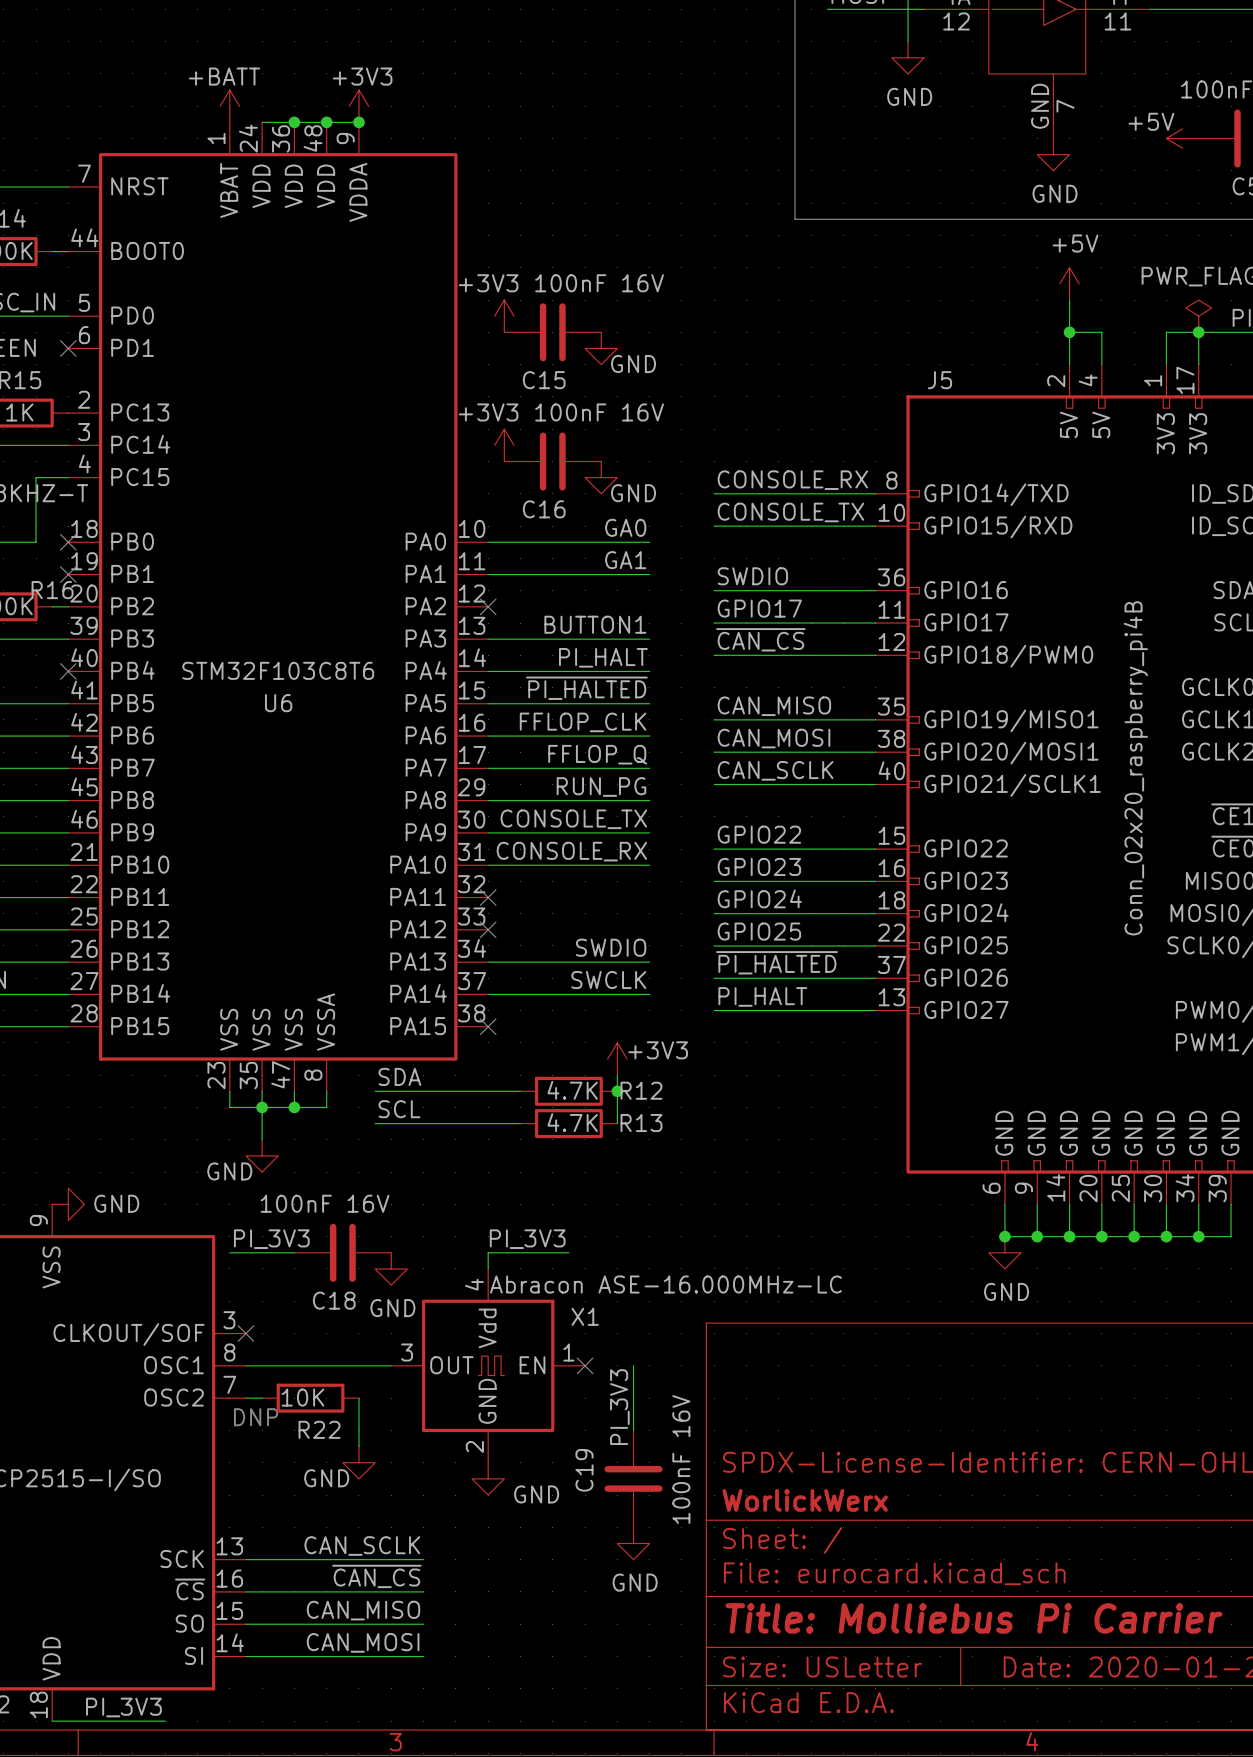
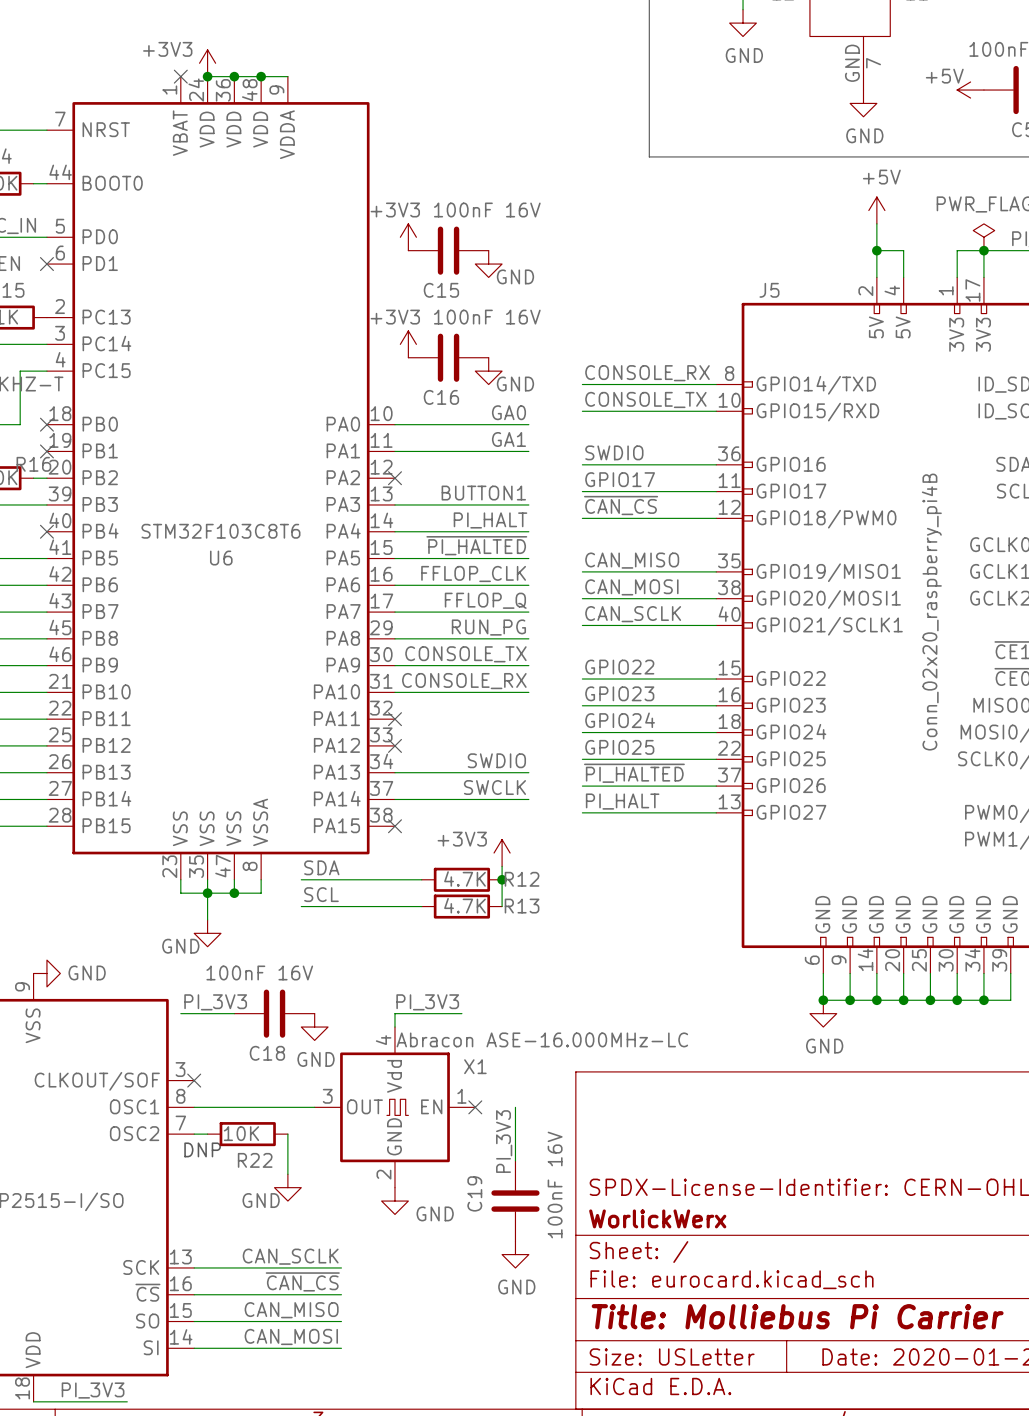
power symbol text position: +3V3 (362, 76) -> +3V3 (167, 49)
power symbol: +BATT (229, 106) -> none
power symbol position: +3V3 (358, 106) -> +3V3 (207, 63)
no-connect mark: none -> (180, 76)
junction: none -> (207, 76)
junction: (358, 122) -> none
power symbol text position: +3V3 (658, 1050) -> +3V3 (462, 839)

